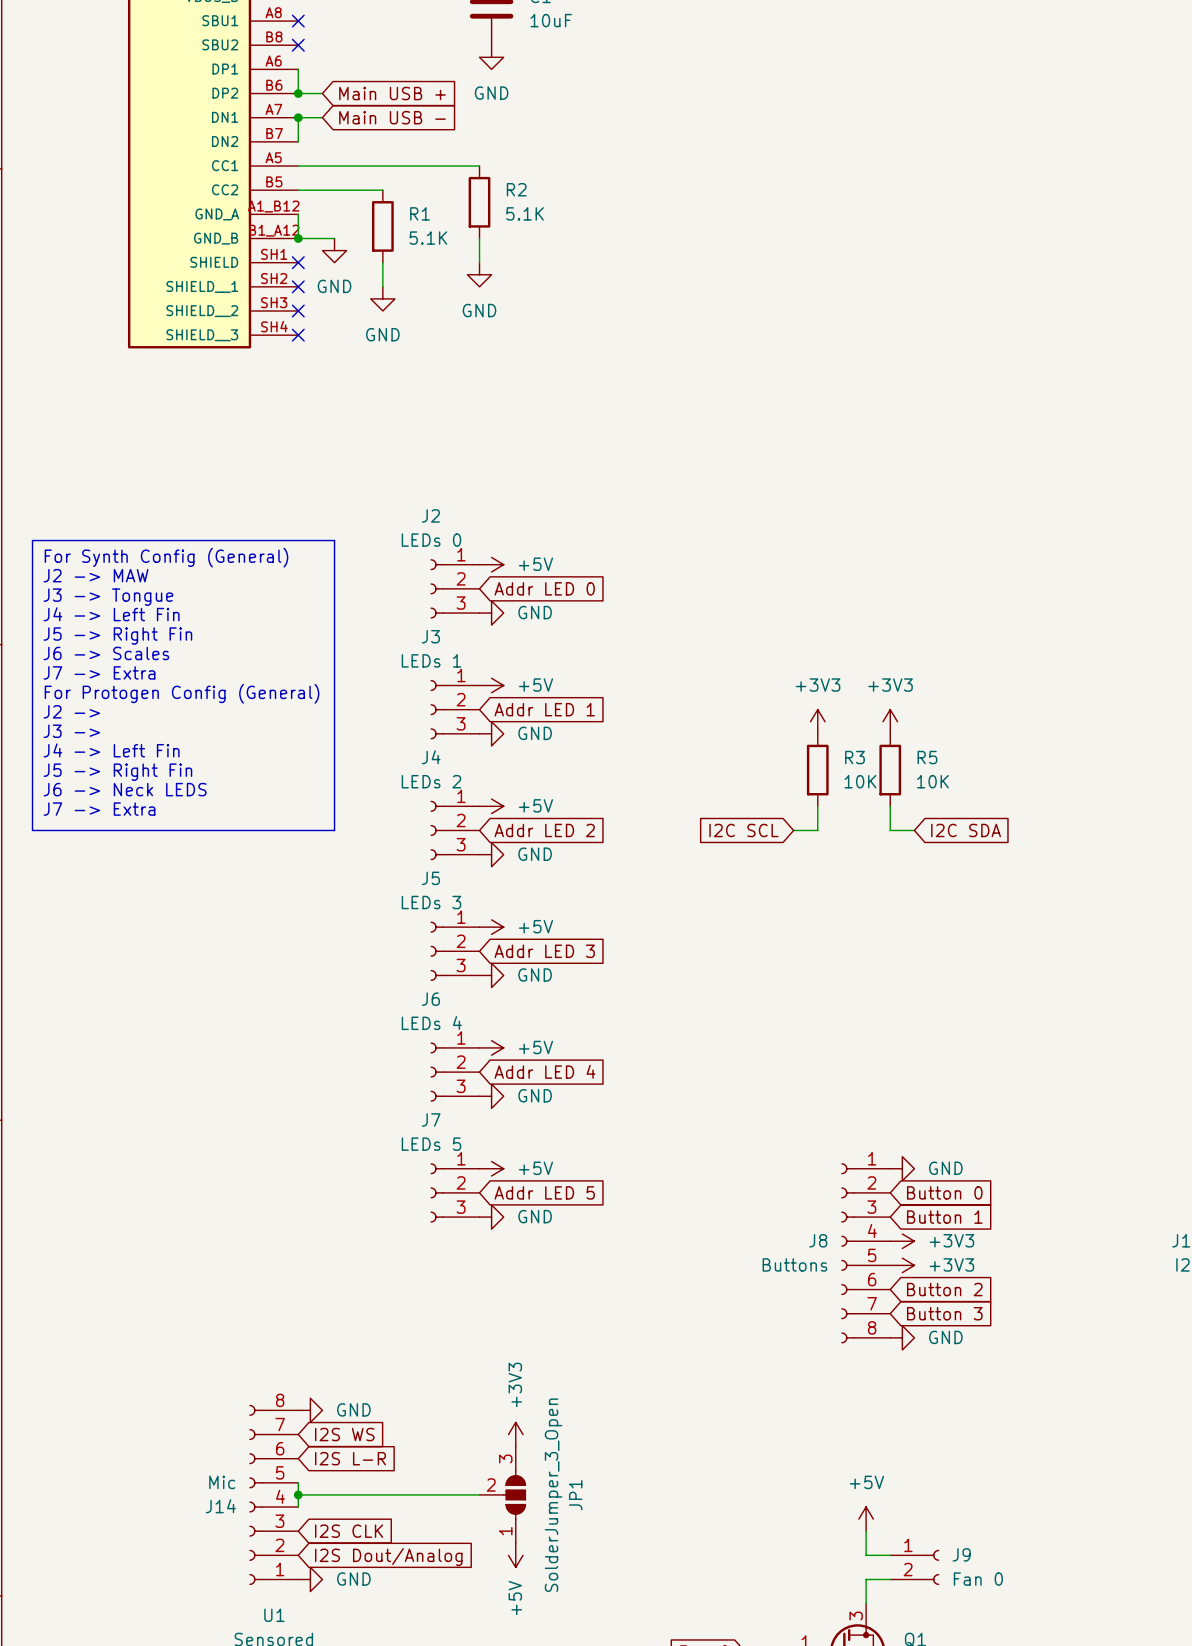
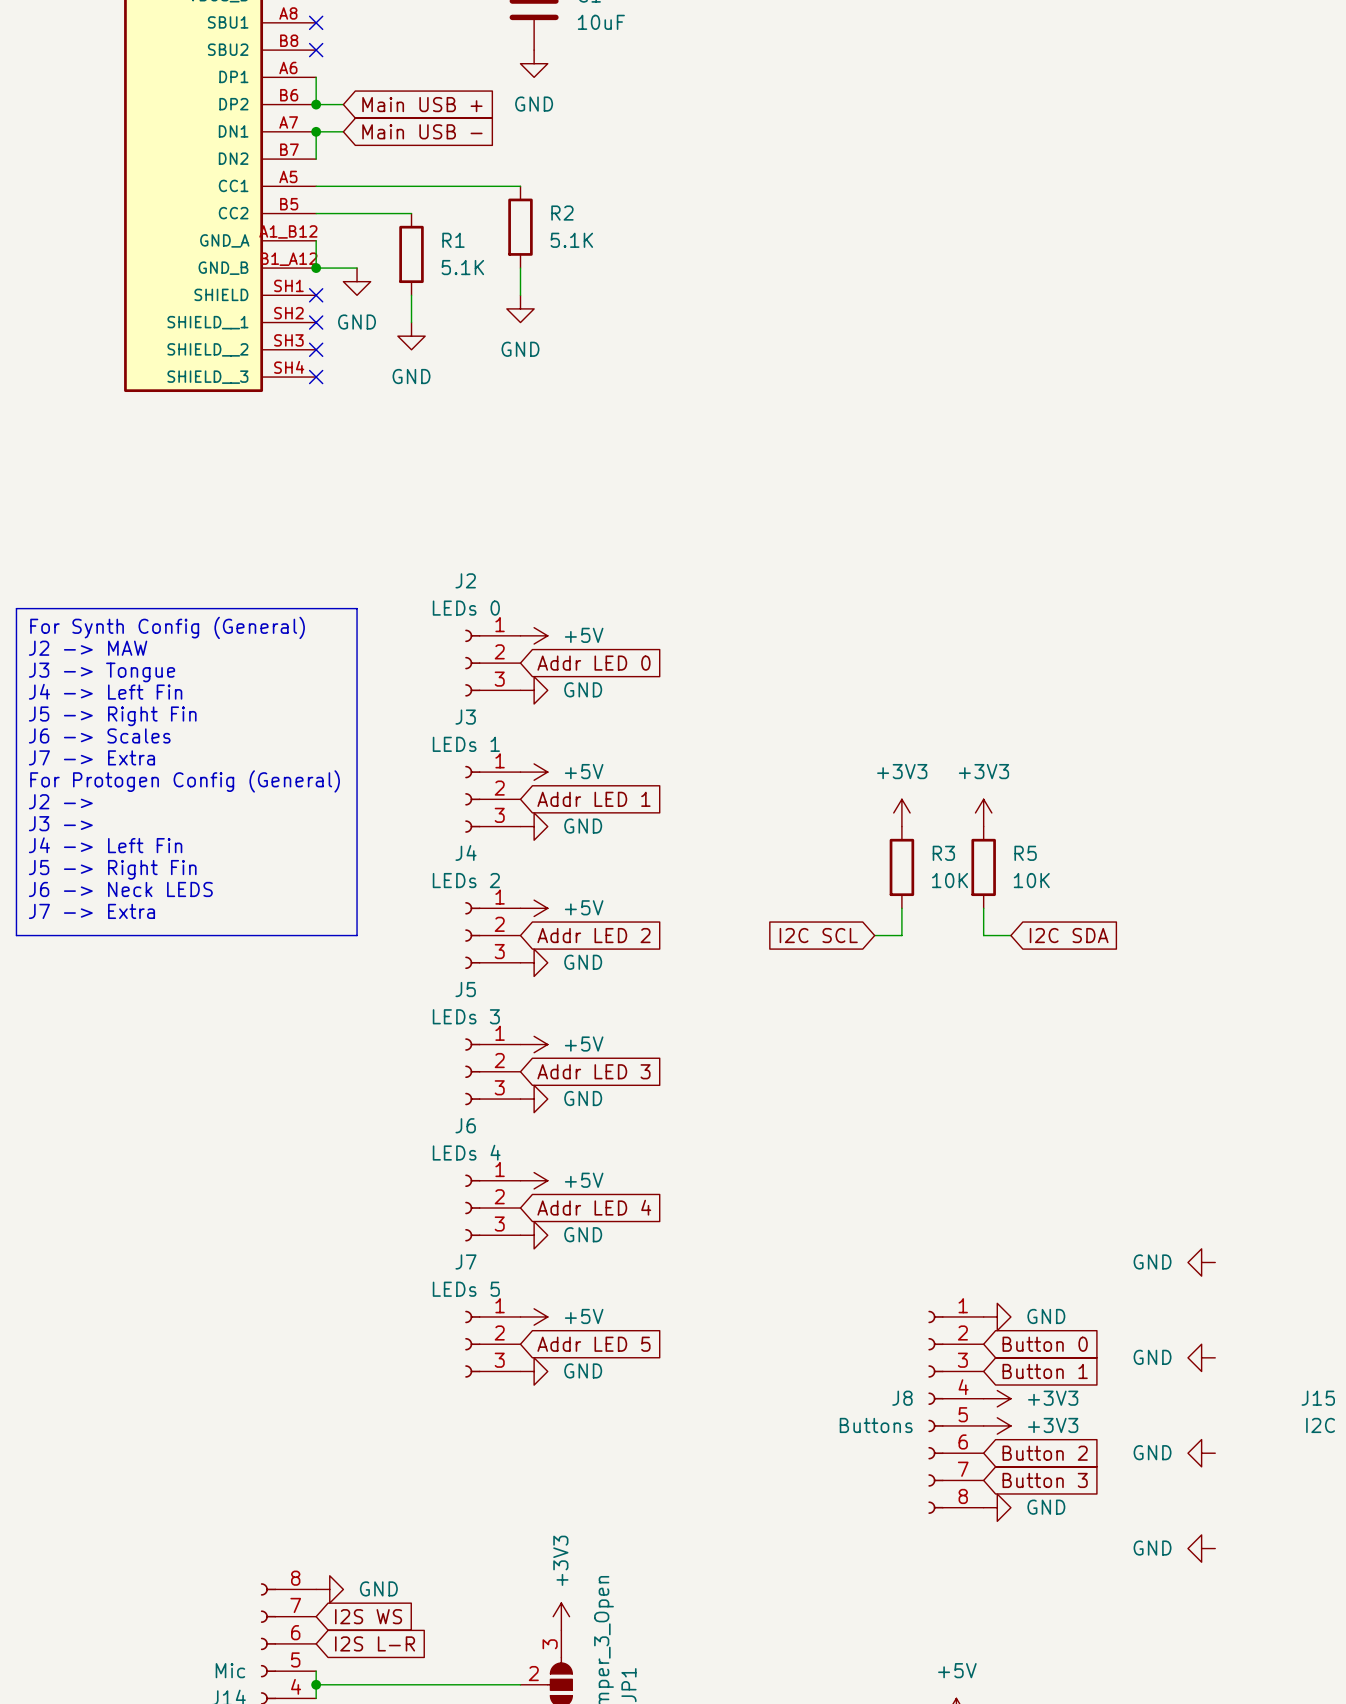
power symbol: none -> GND (1201, 1262)
power symbol: none -> GND (1201, 1357)
power symbol: none -> GND (1201, 1453)
power symbol: none -> GND (1201, 1548)

